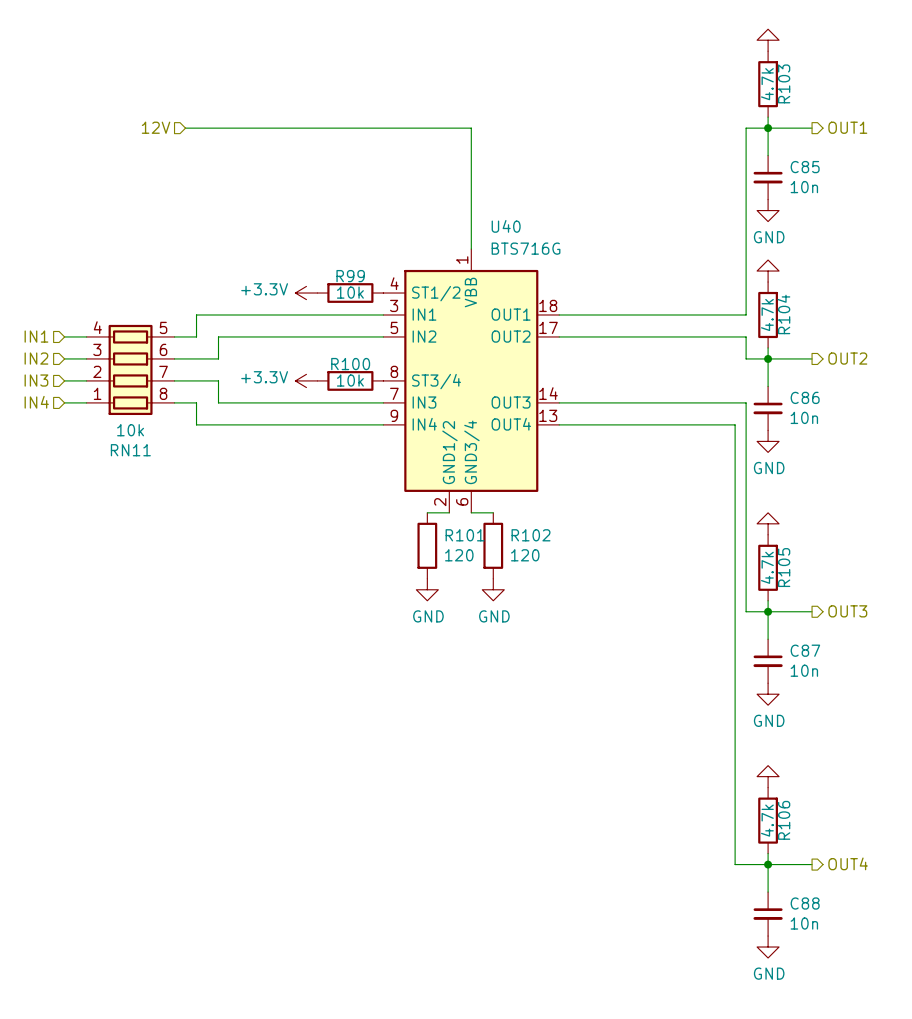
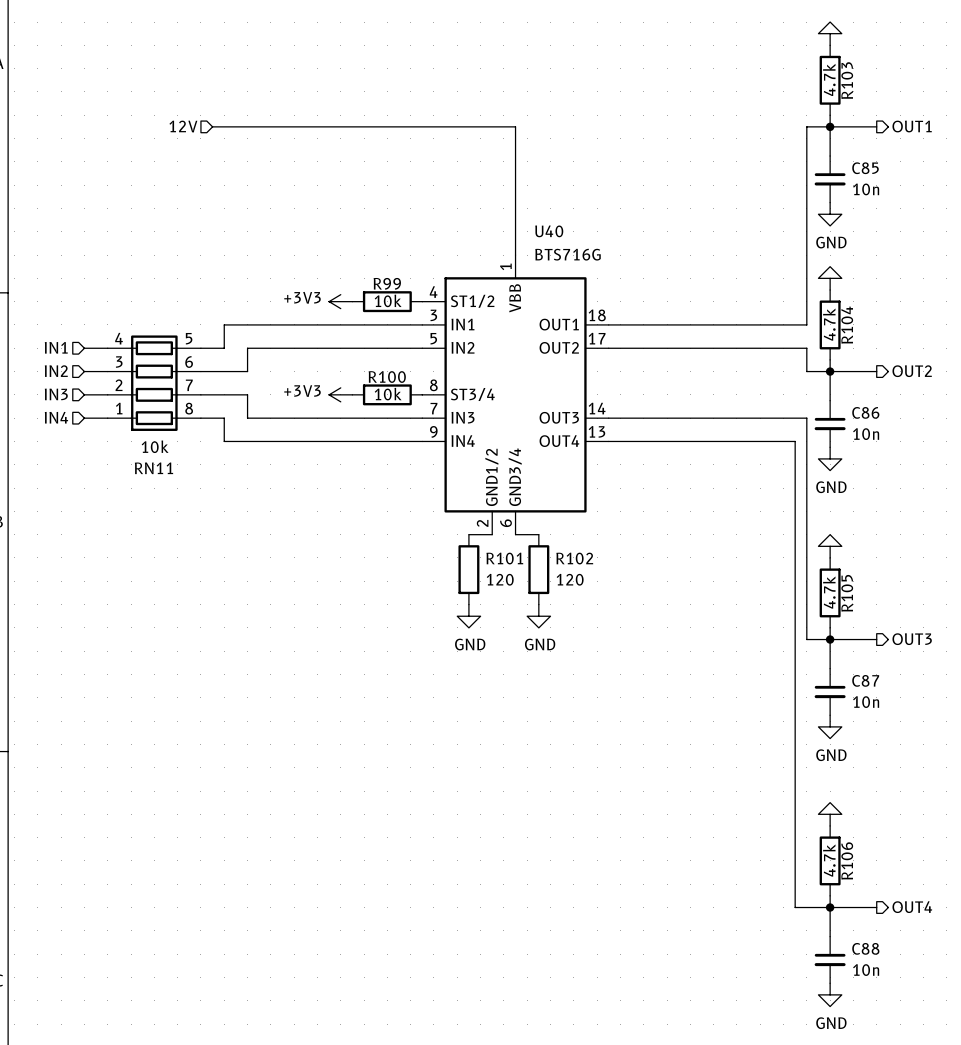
power symbol: +3.3V (306, 293) -> +3V3 (340, 301)
power symbol: +3.3V (306, 380) -> +3V3 (340, 394)

